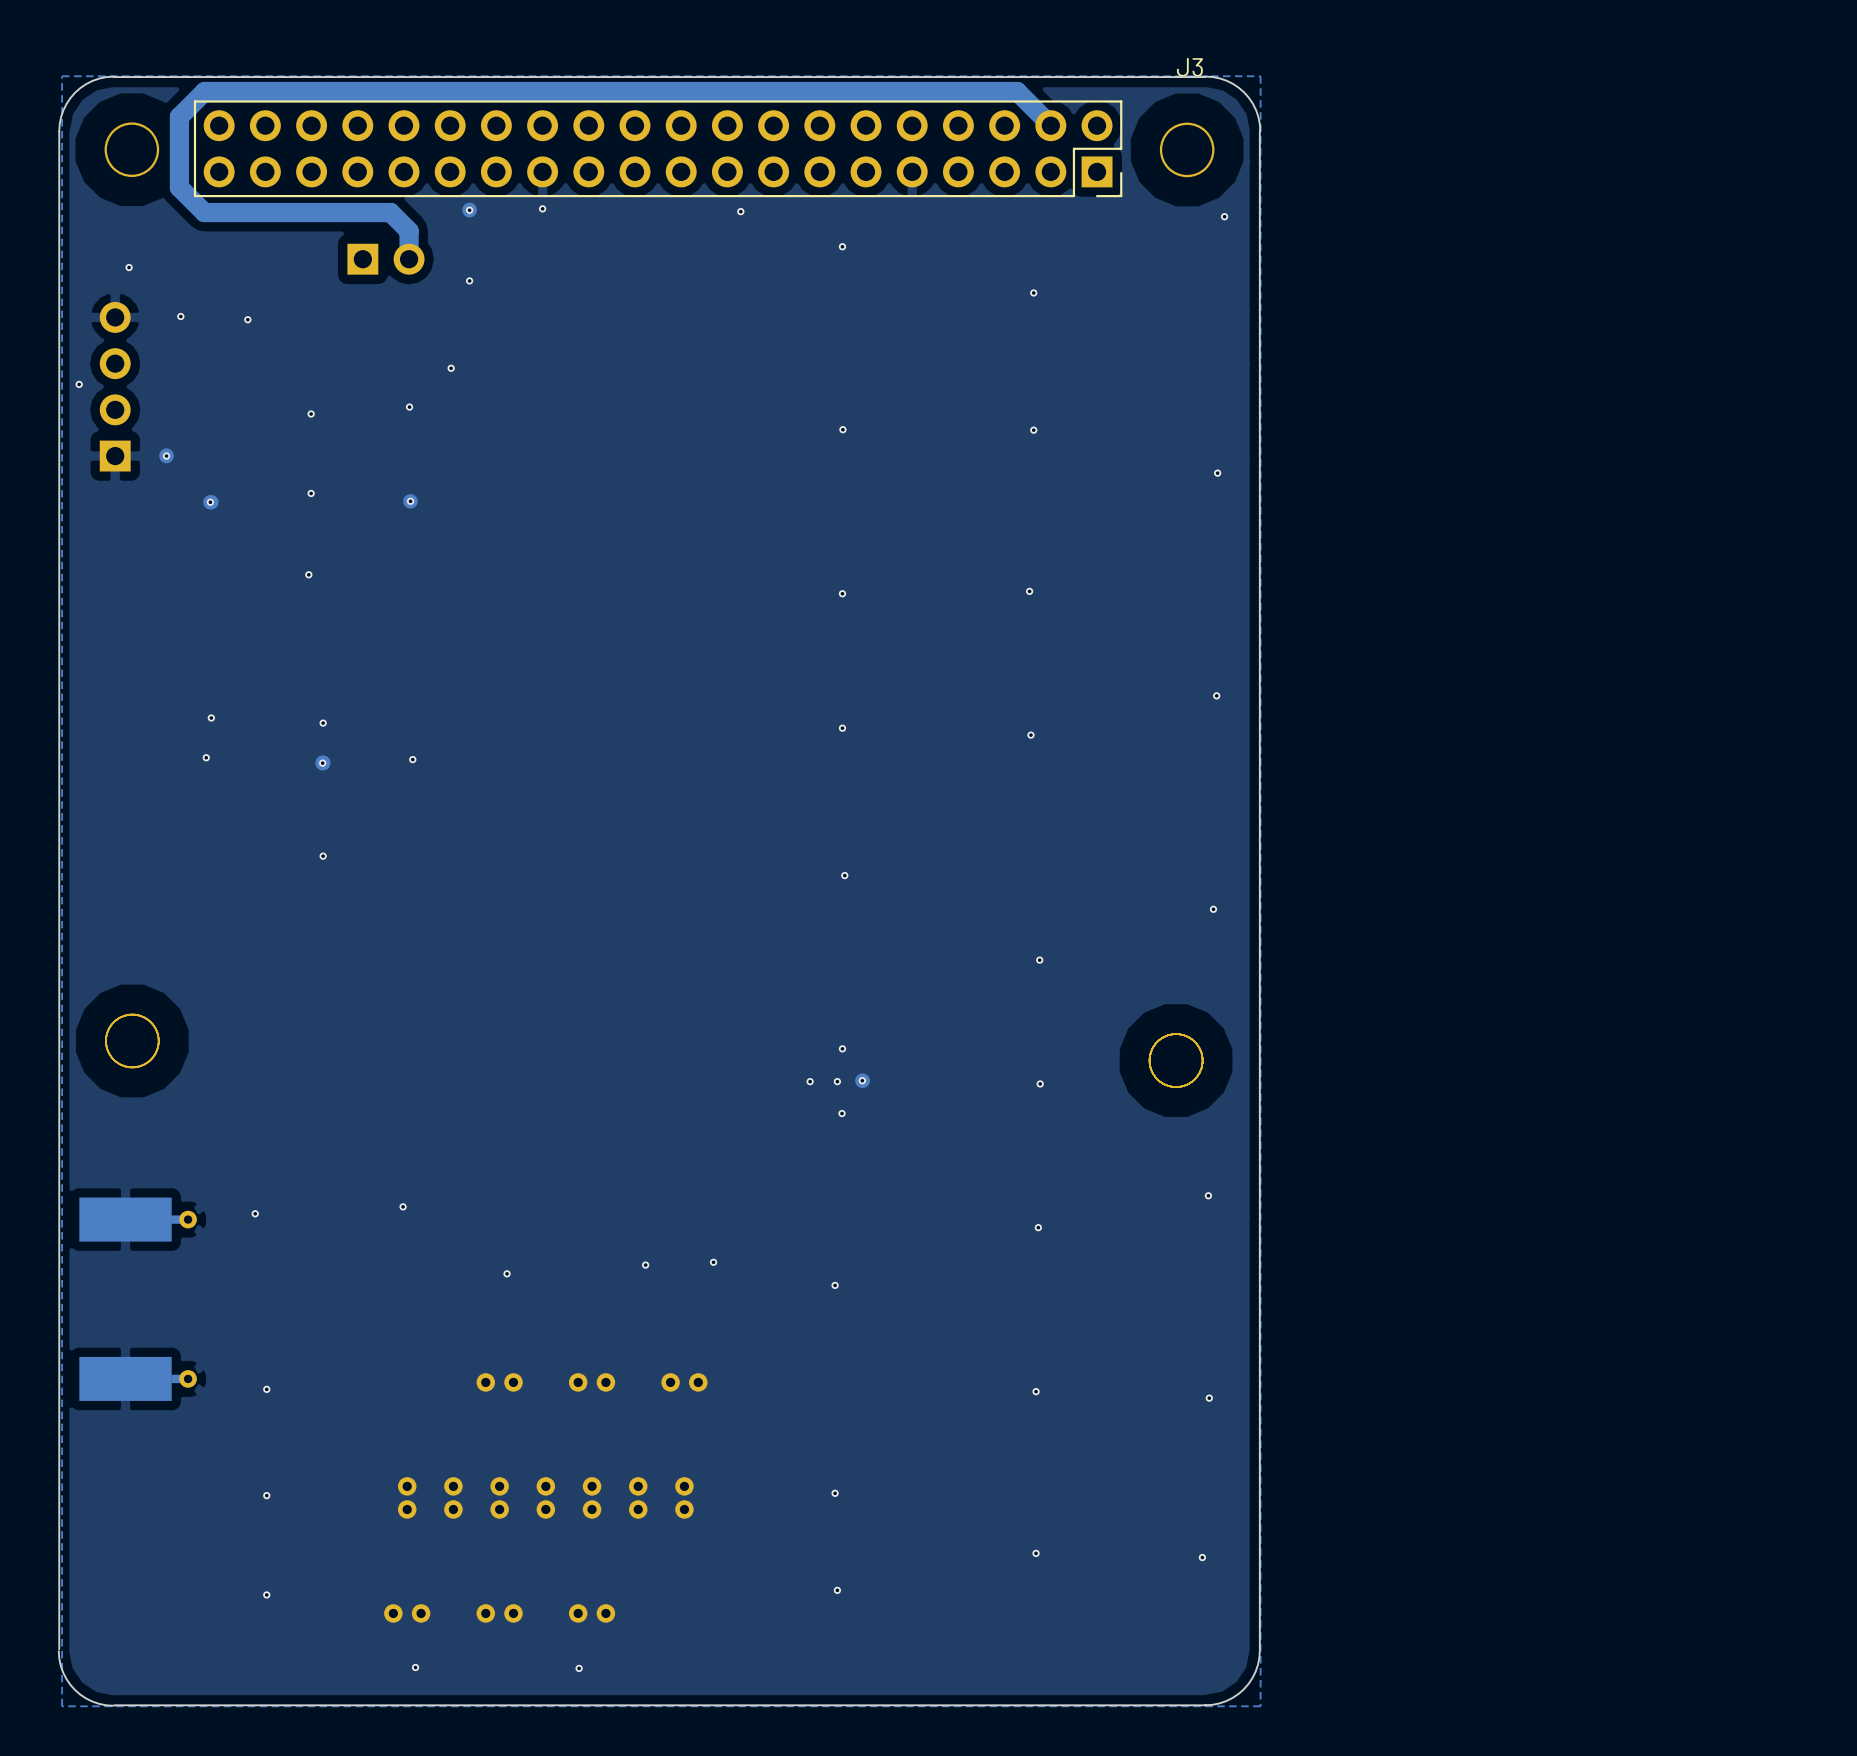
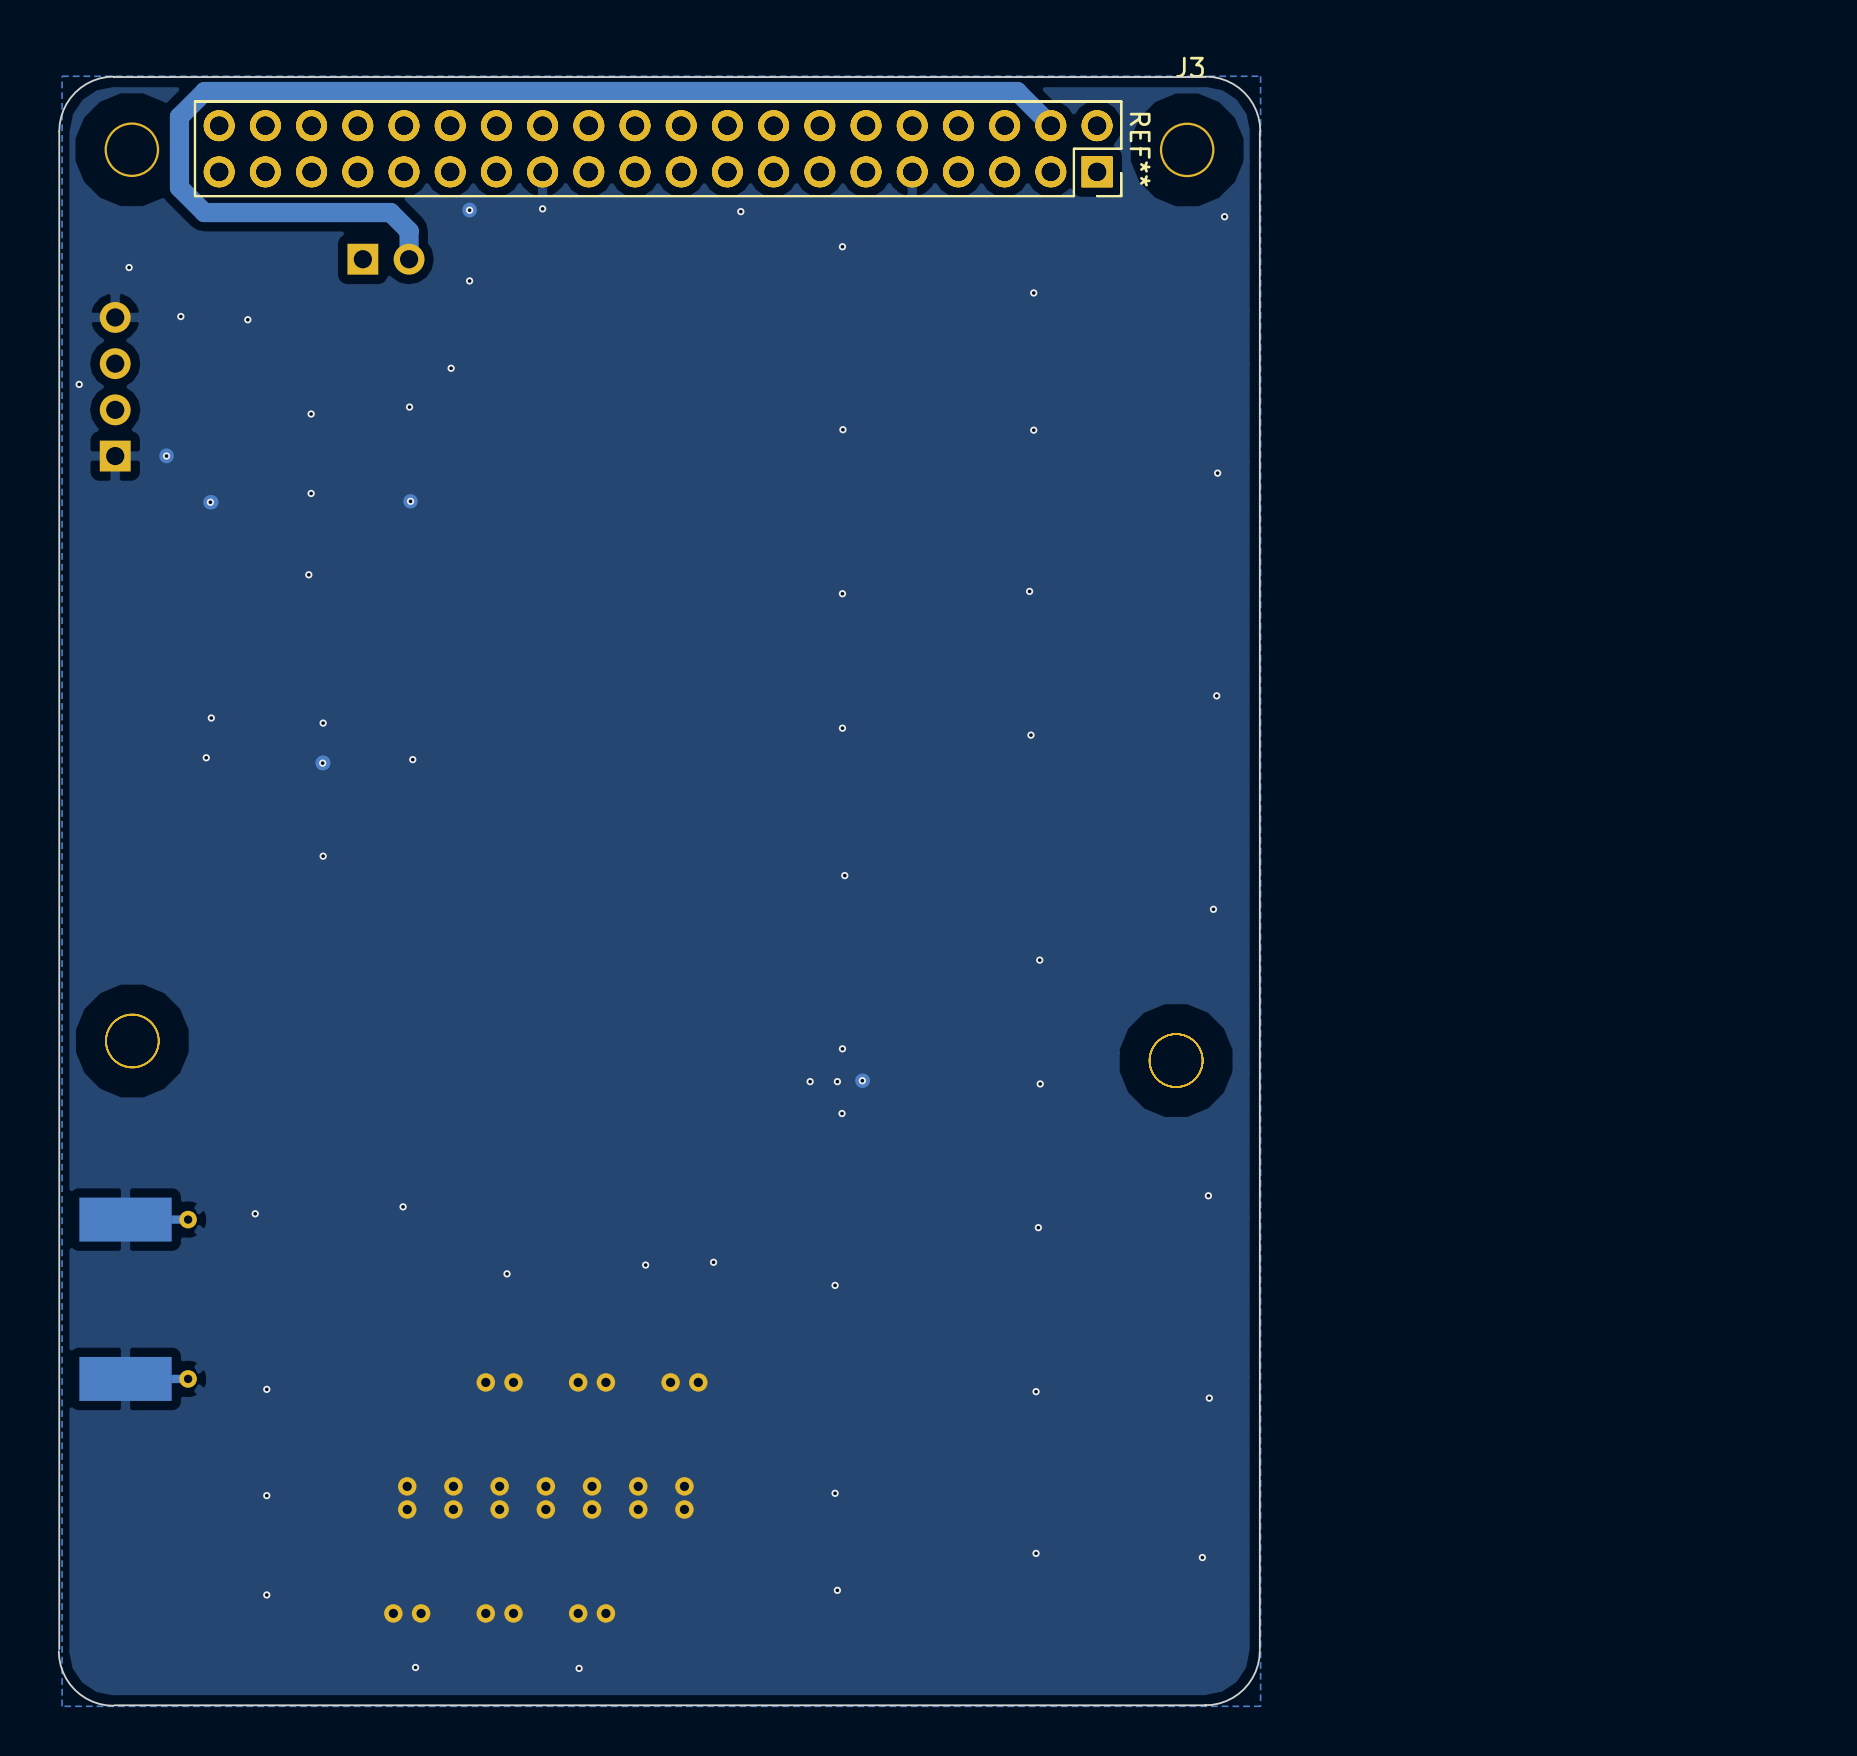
REF**: none -> (658, 148)

